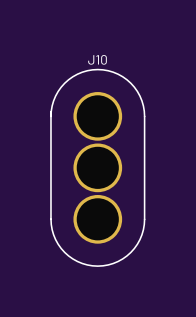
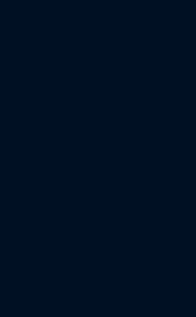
J10: (97, 167) -> none

